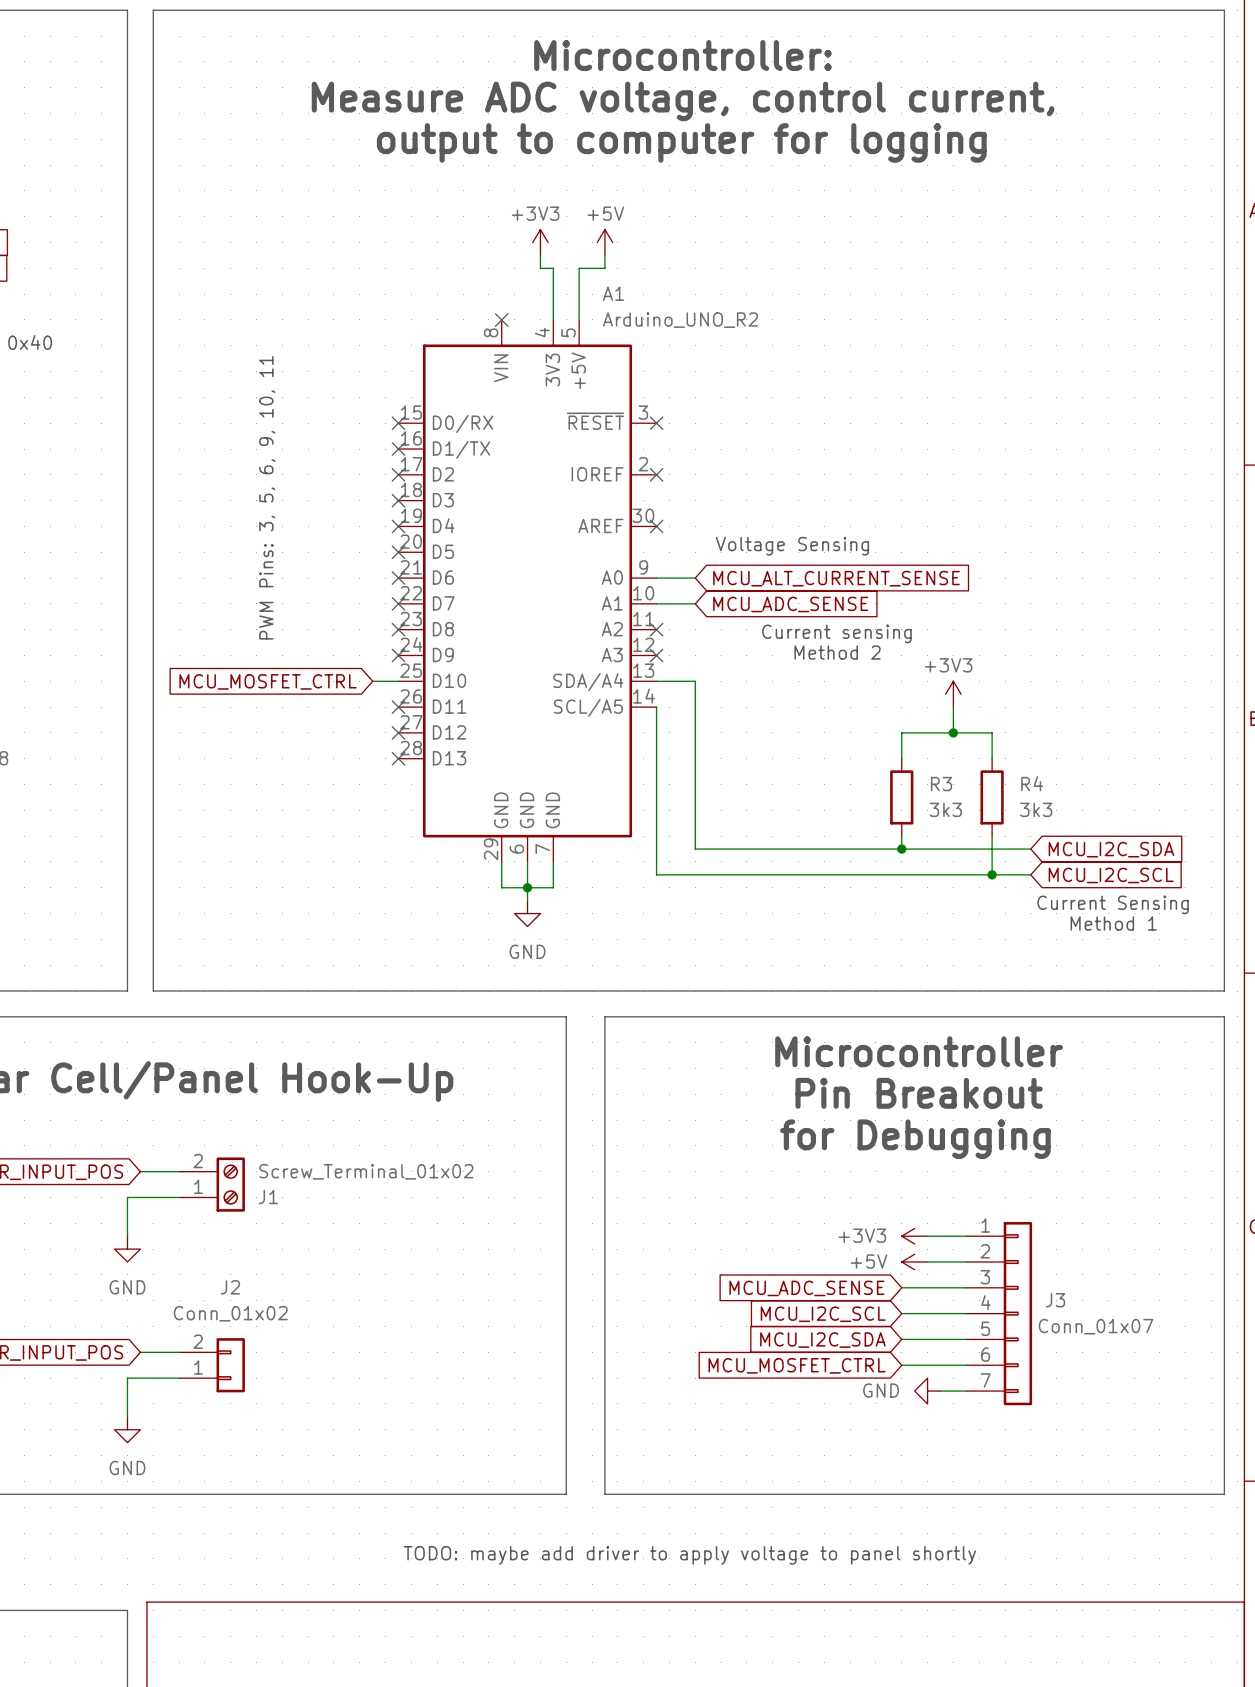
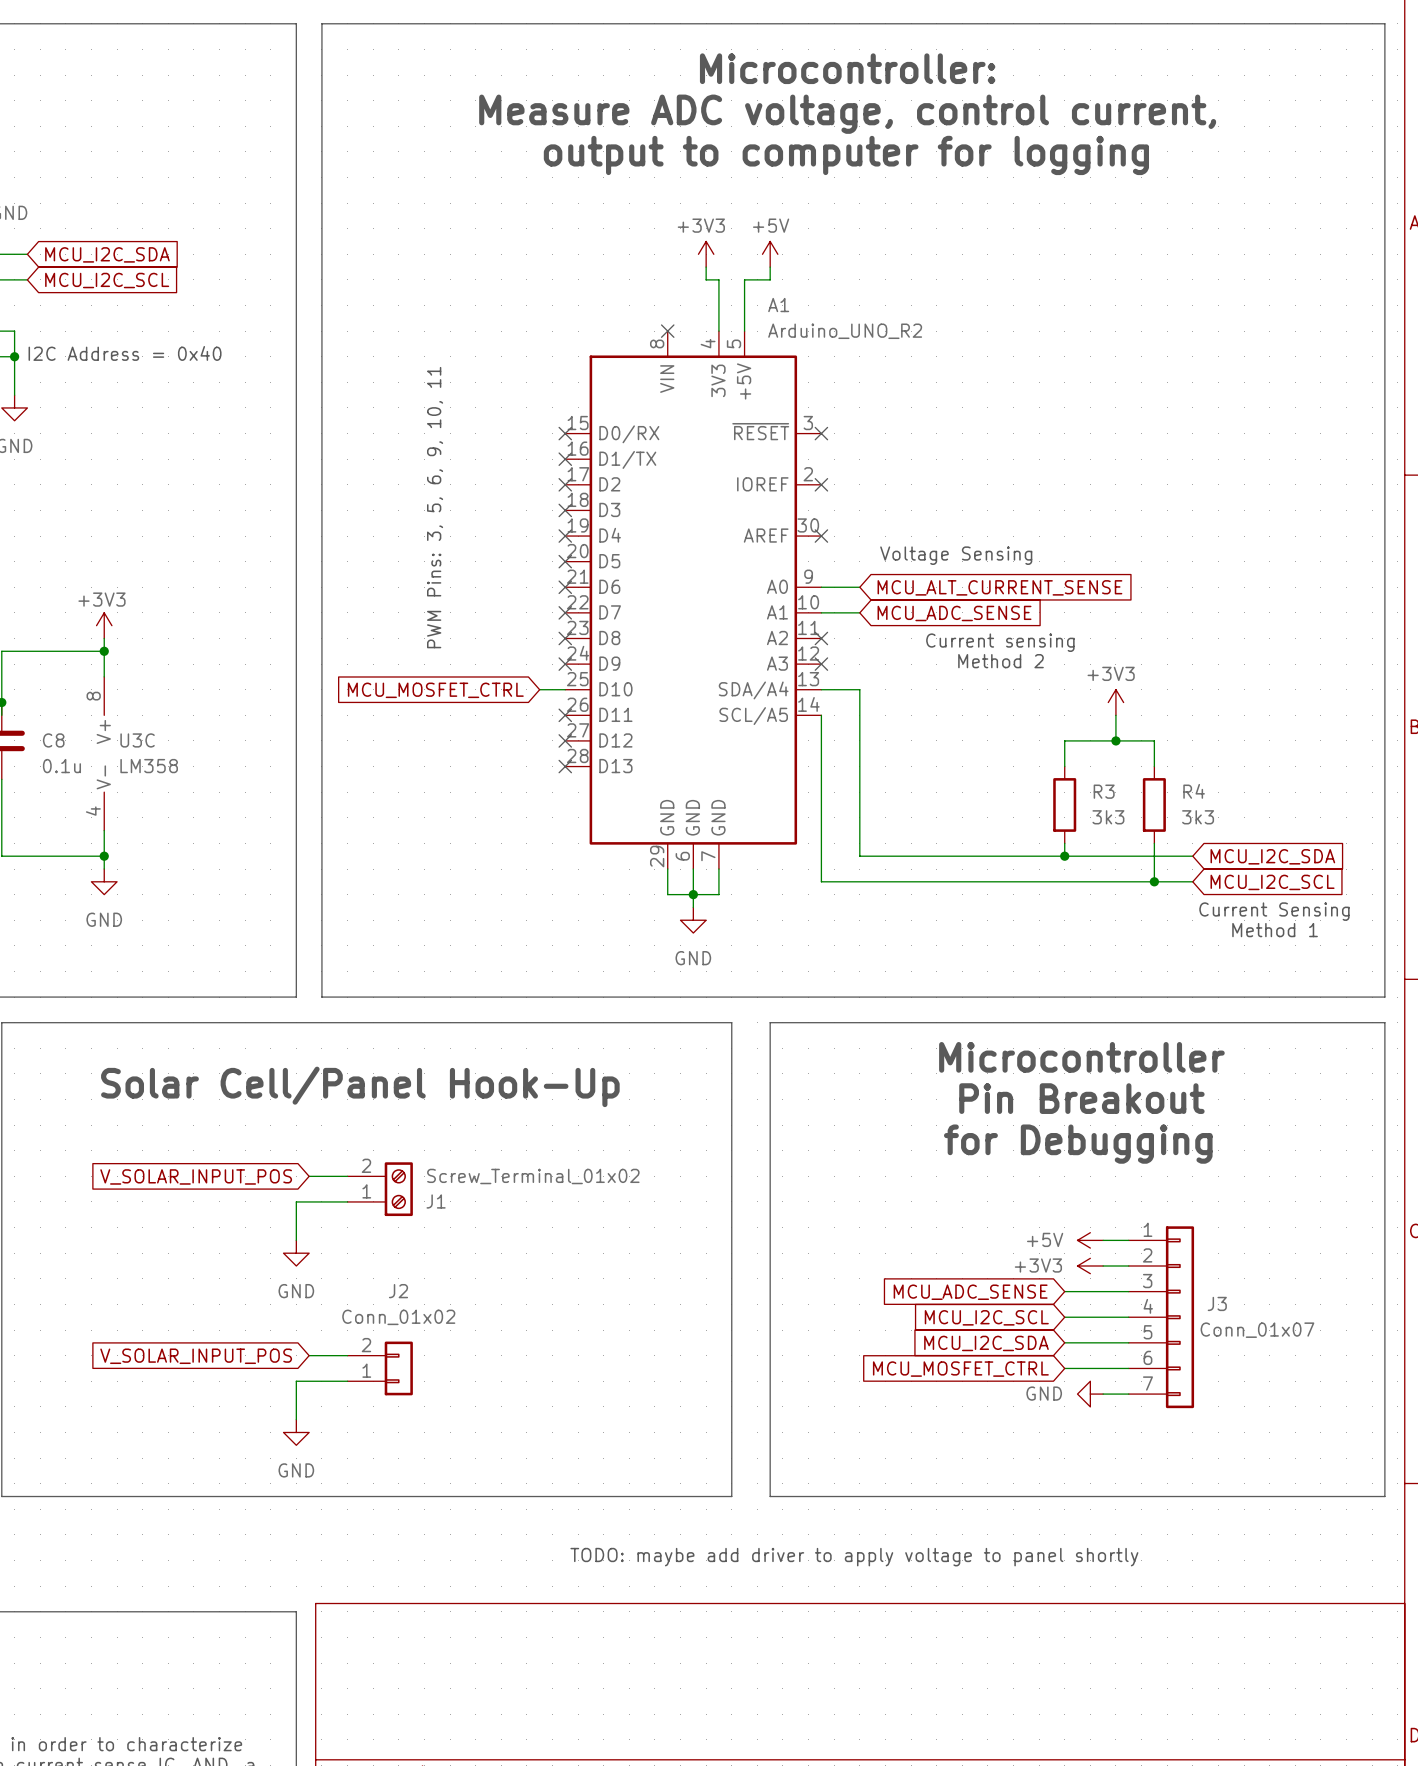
power symbol position: +3V3 (914, 1236) -> +3V3 (1090, 1266)
power symbol position: +5V (914, 1262) -> +5V (1090, 1240)

